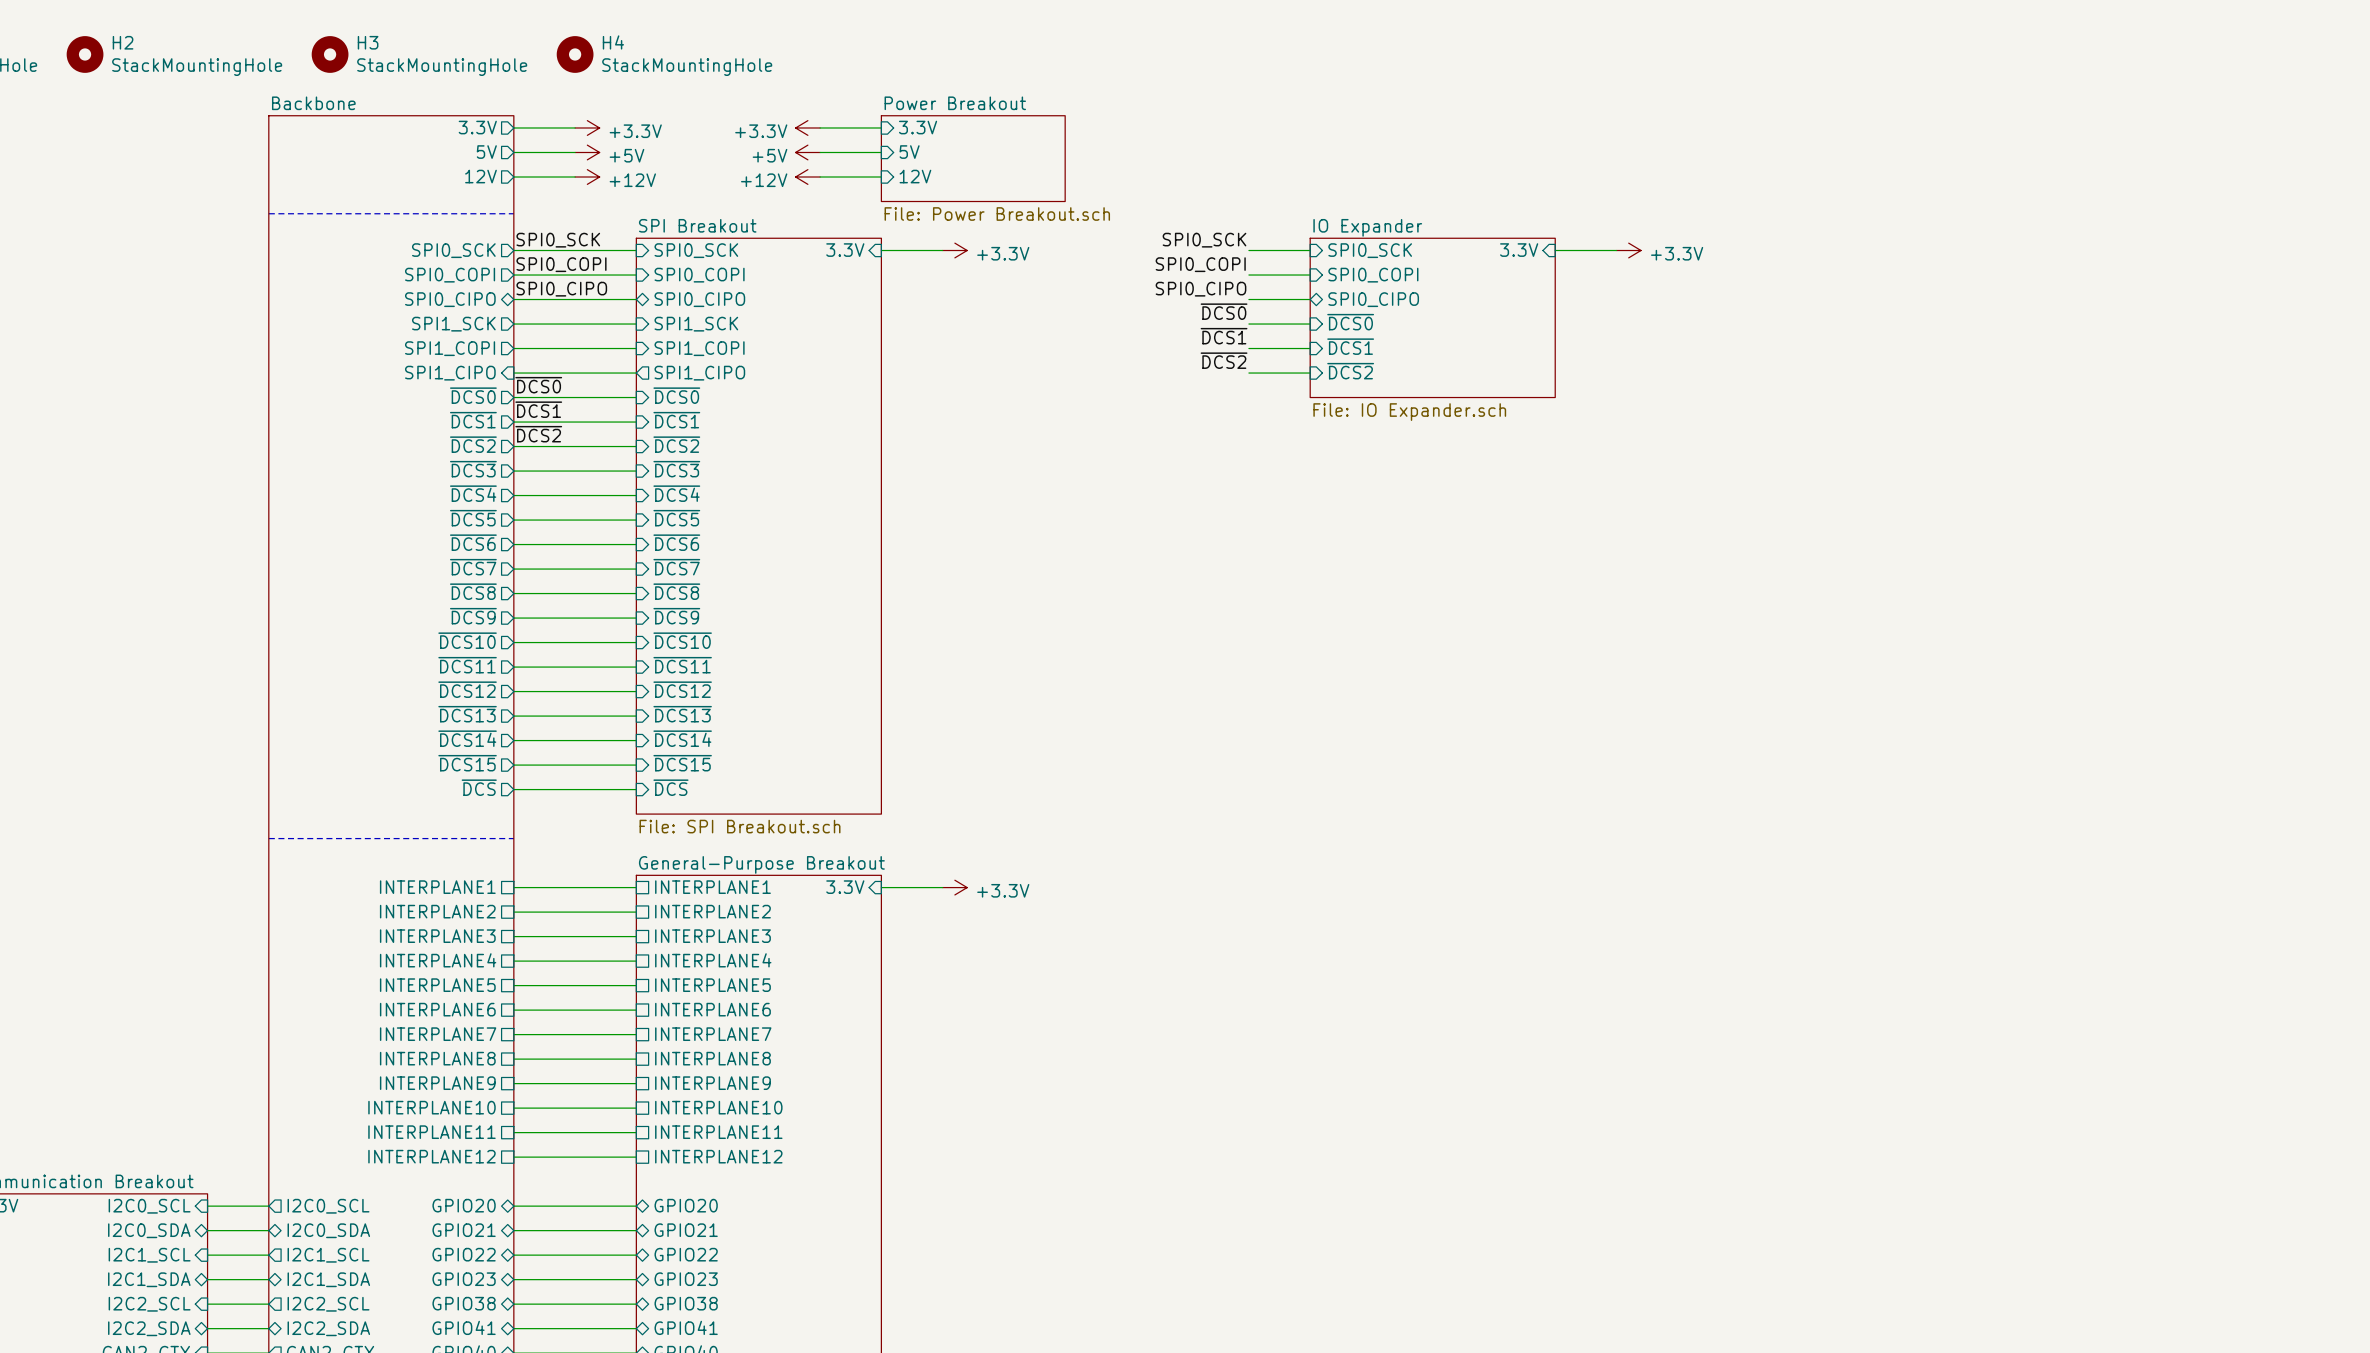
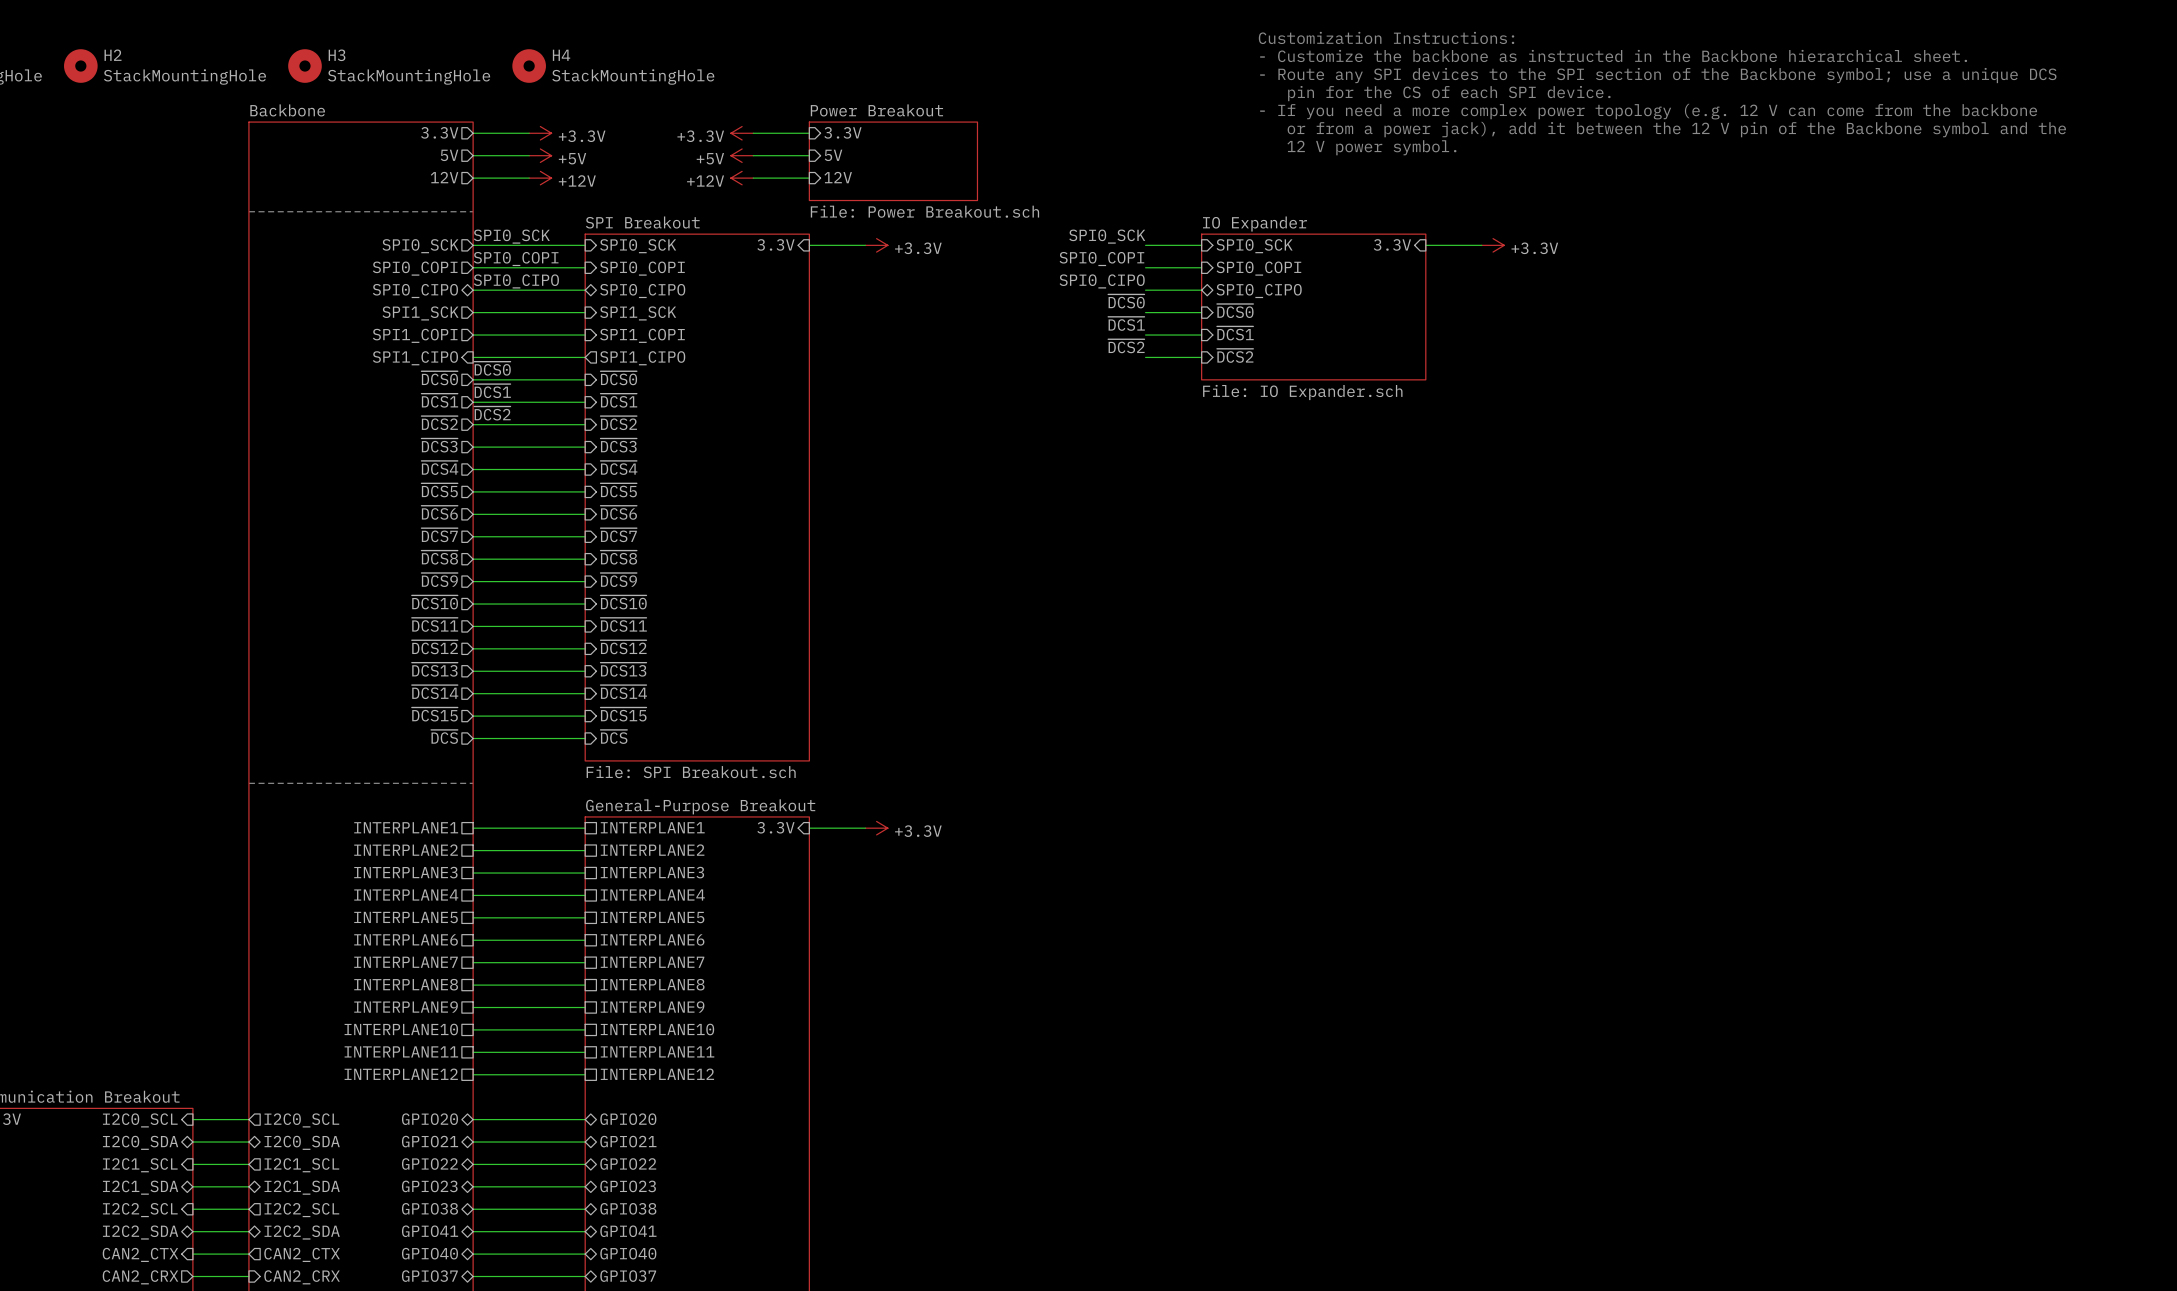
text: none -> Customization Instructions: (1386, 37)
text: none -> - Customize the backbone as instructed in the Backbone hierarchical sheet. (1613, 55)
text: none -> - Route any SPI devices to the SPI section of the Backbone symbol; use a unique DCS (1658, 75)
text: none -> pin for the CS of each SPI device. (1449, 93)
text: none -> - If you need a more complex power topology (e.g. 12 V can come from the backbone (1648, 111)
text: none -> or from a power jack), add it between the 12 V pin of the Backbone symbol and the (1676, 129)
text: none -> 12 V power symbol. (1371, 147)

